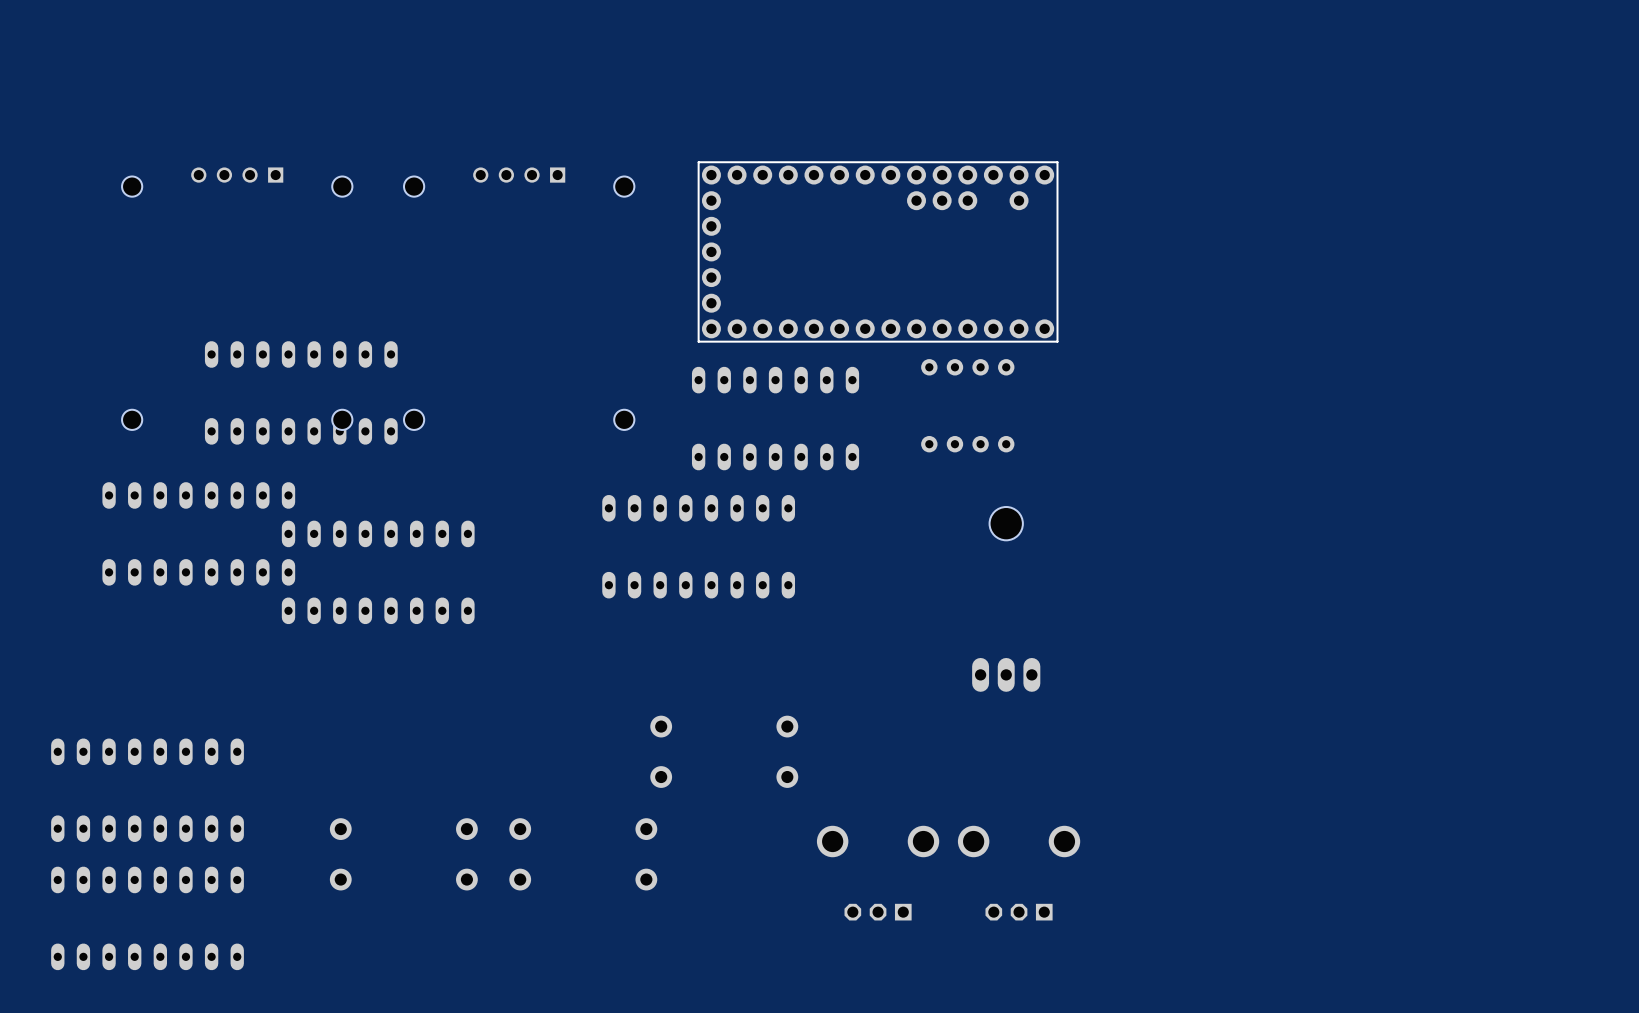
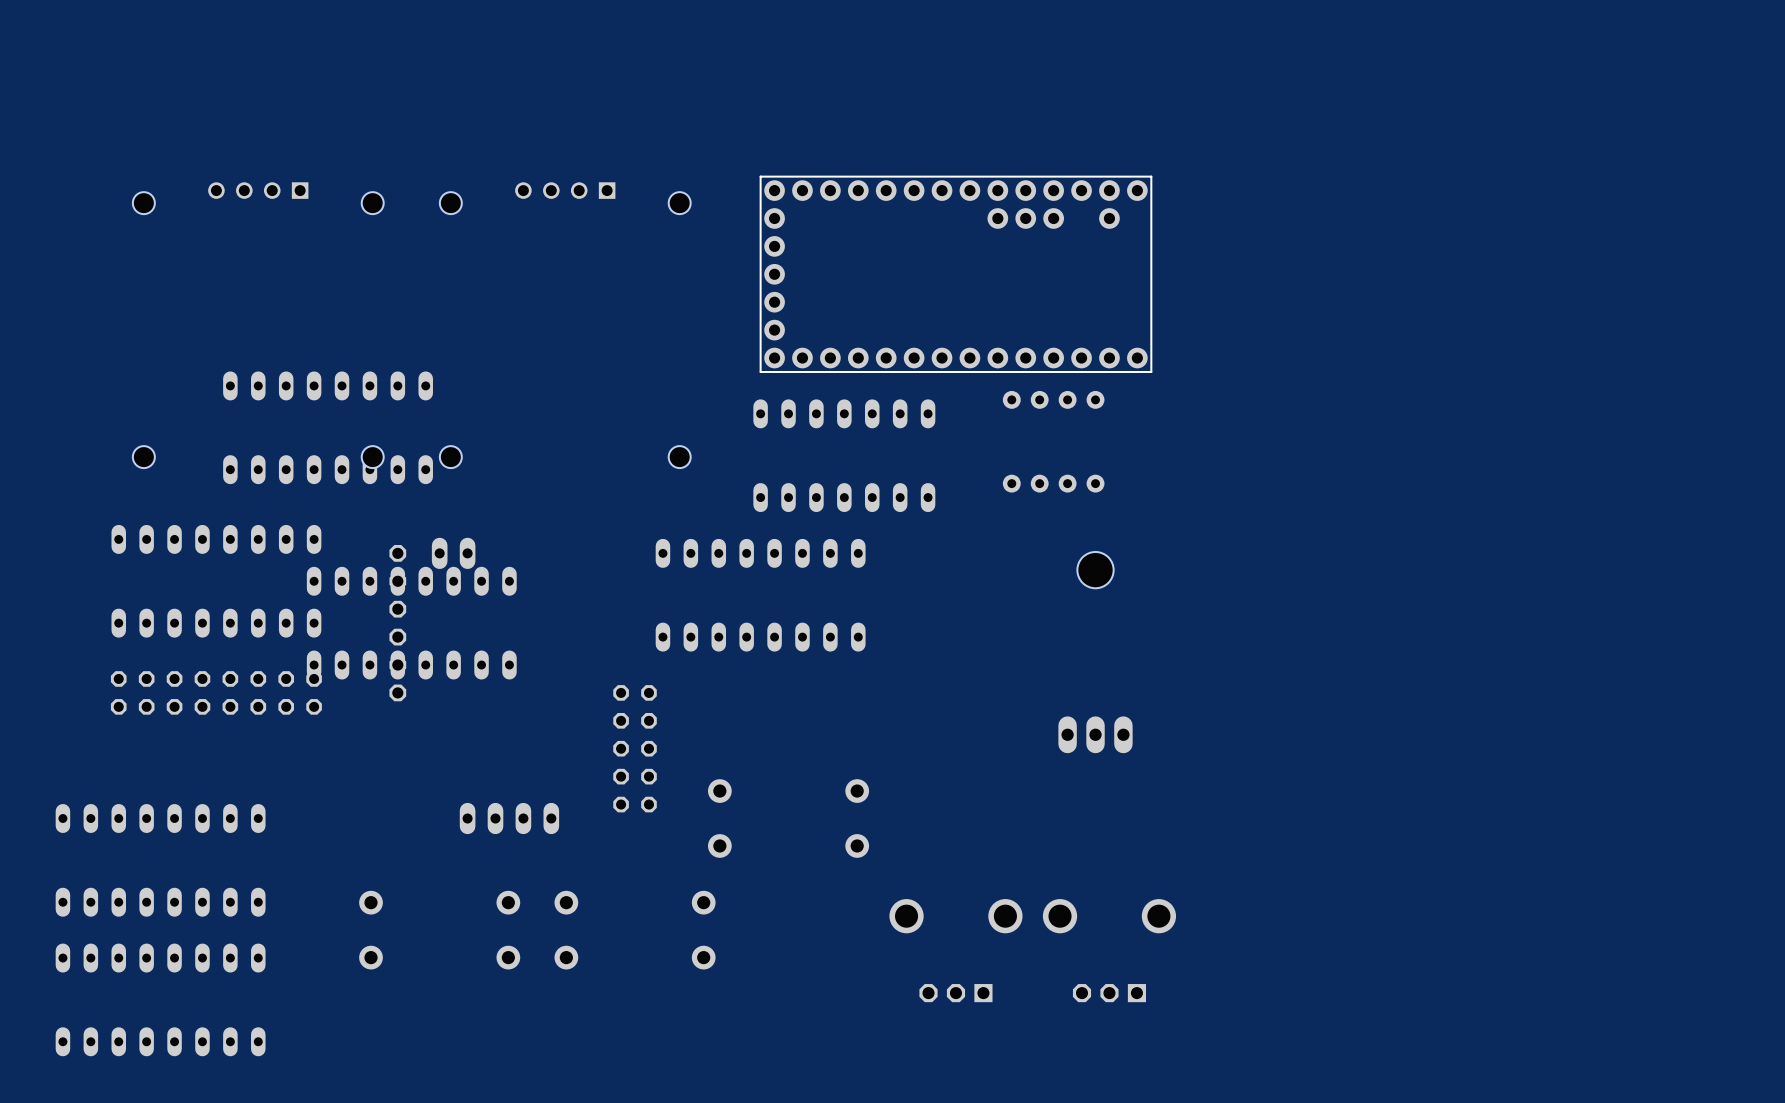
part: none -> (453, 553)
part: none -> (397, 623)
part: none -> (216, 692)
part: none -> (635, 748)
part: none -> (509, 818)

